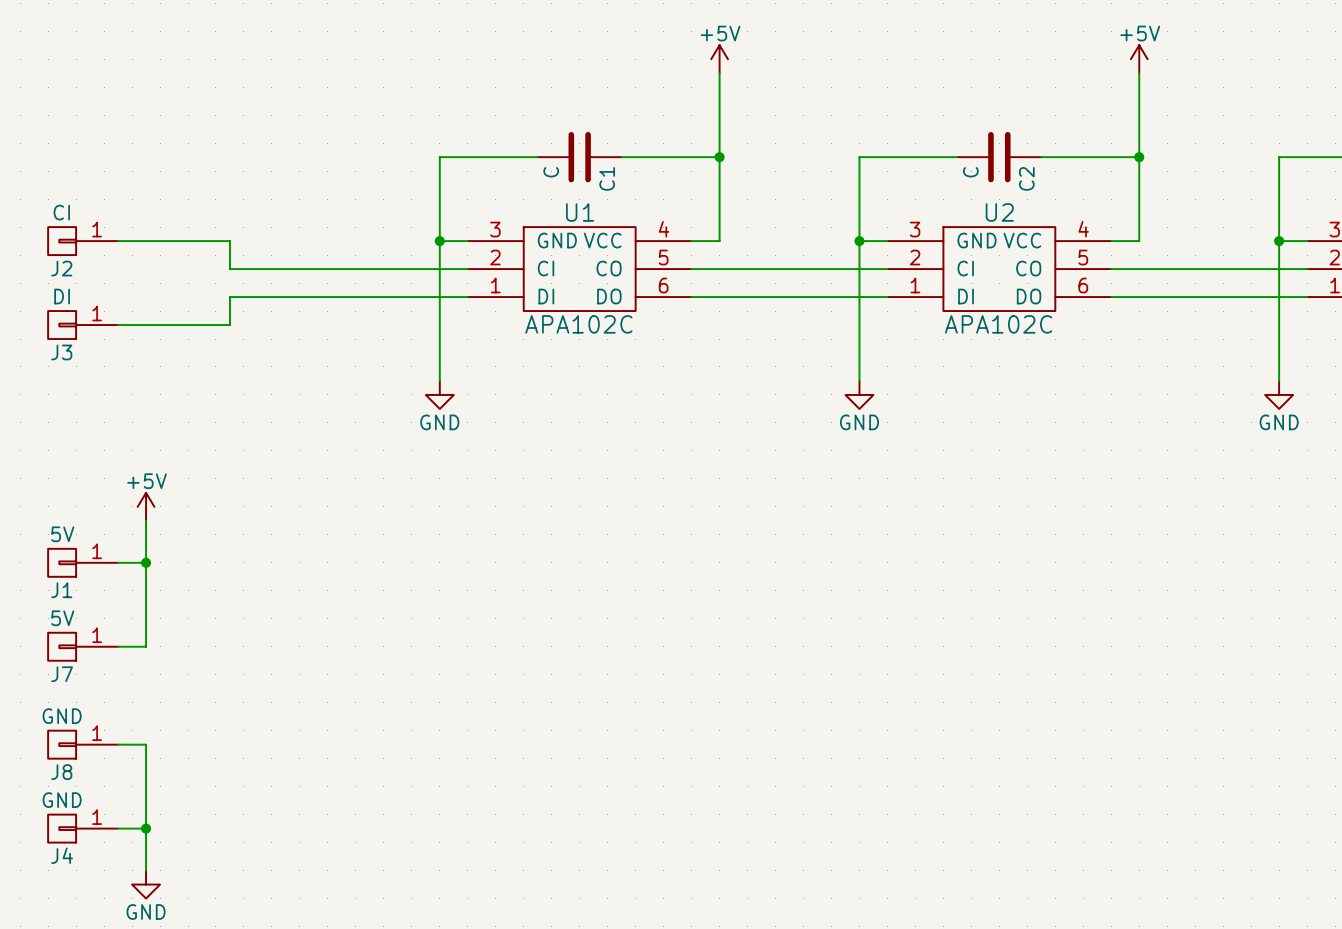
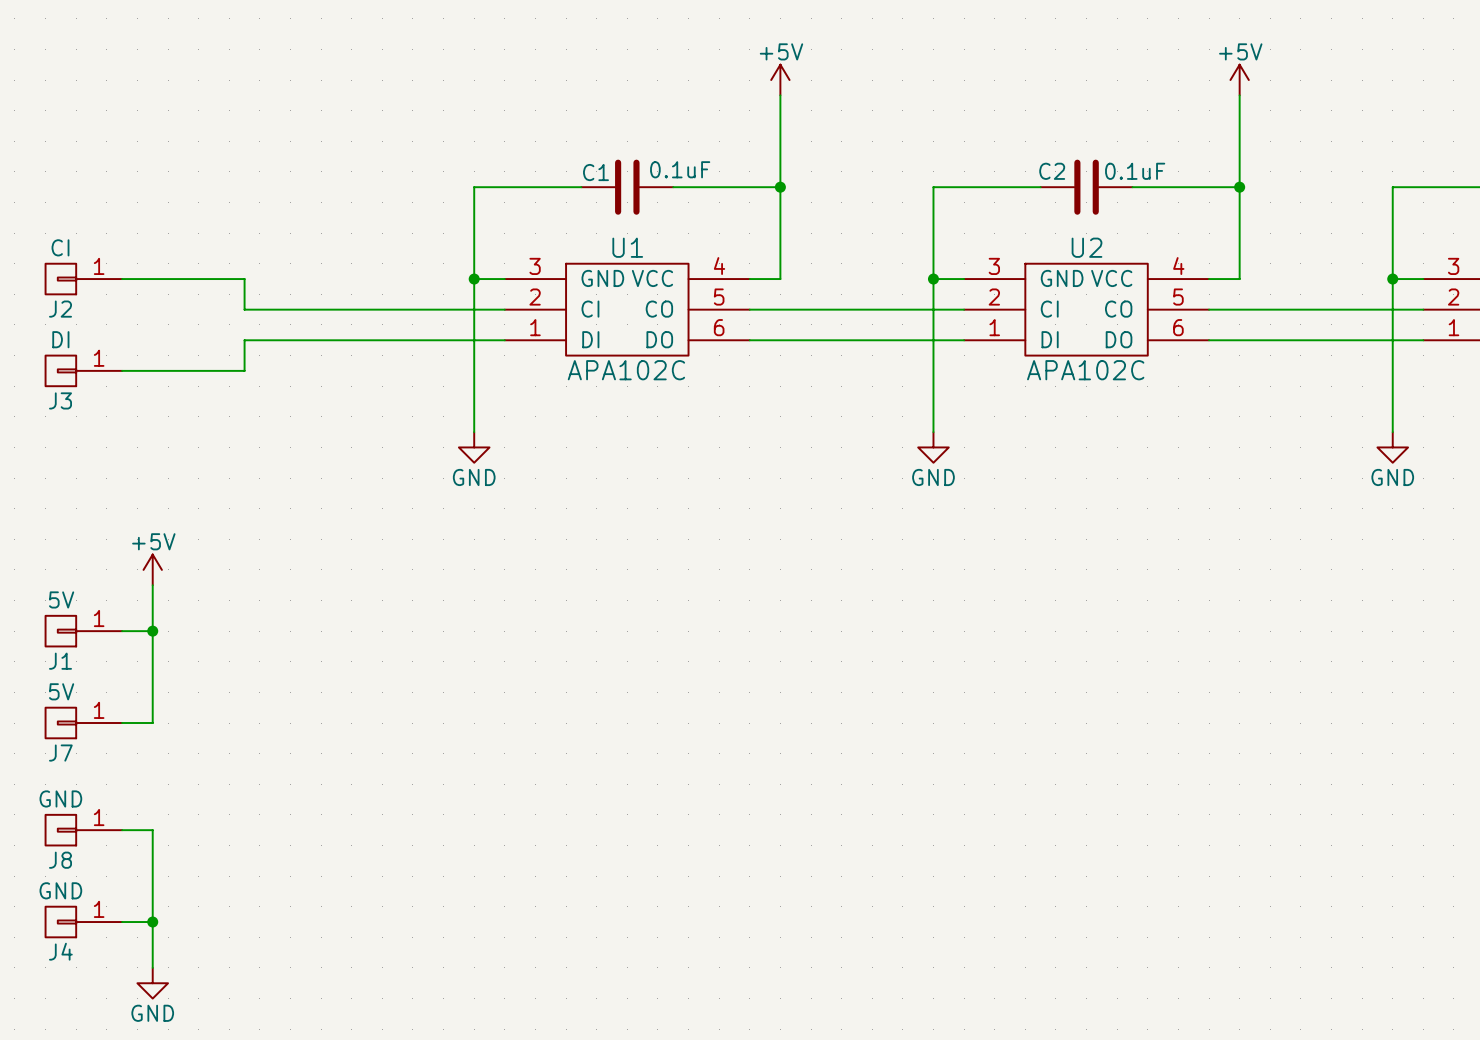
C1 value: C (551, 172) -> 0.1uF (680, 169)
C2 value: C (970, 172) -> 0.1uF (1135, 171)
C1 name rotation: 0° (607, 178) -> 90° clockwise (595, 172)
C1 name position: C1 (607, 178) -> C1 (595, 172)
C2 name rotation: 0° (1026, 178) -> 90° clockwise (1052, 171)
C2 name position: C2 (1026, 178) -> C2 (1052, 171)

